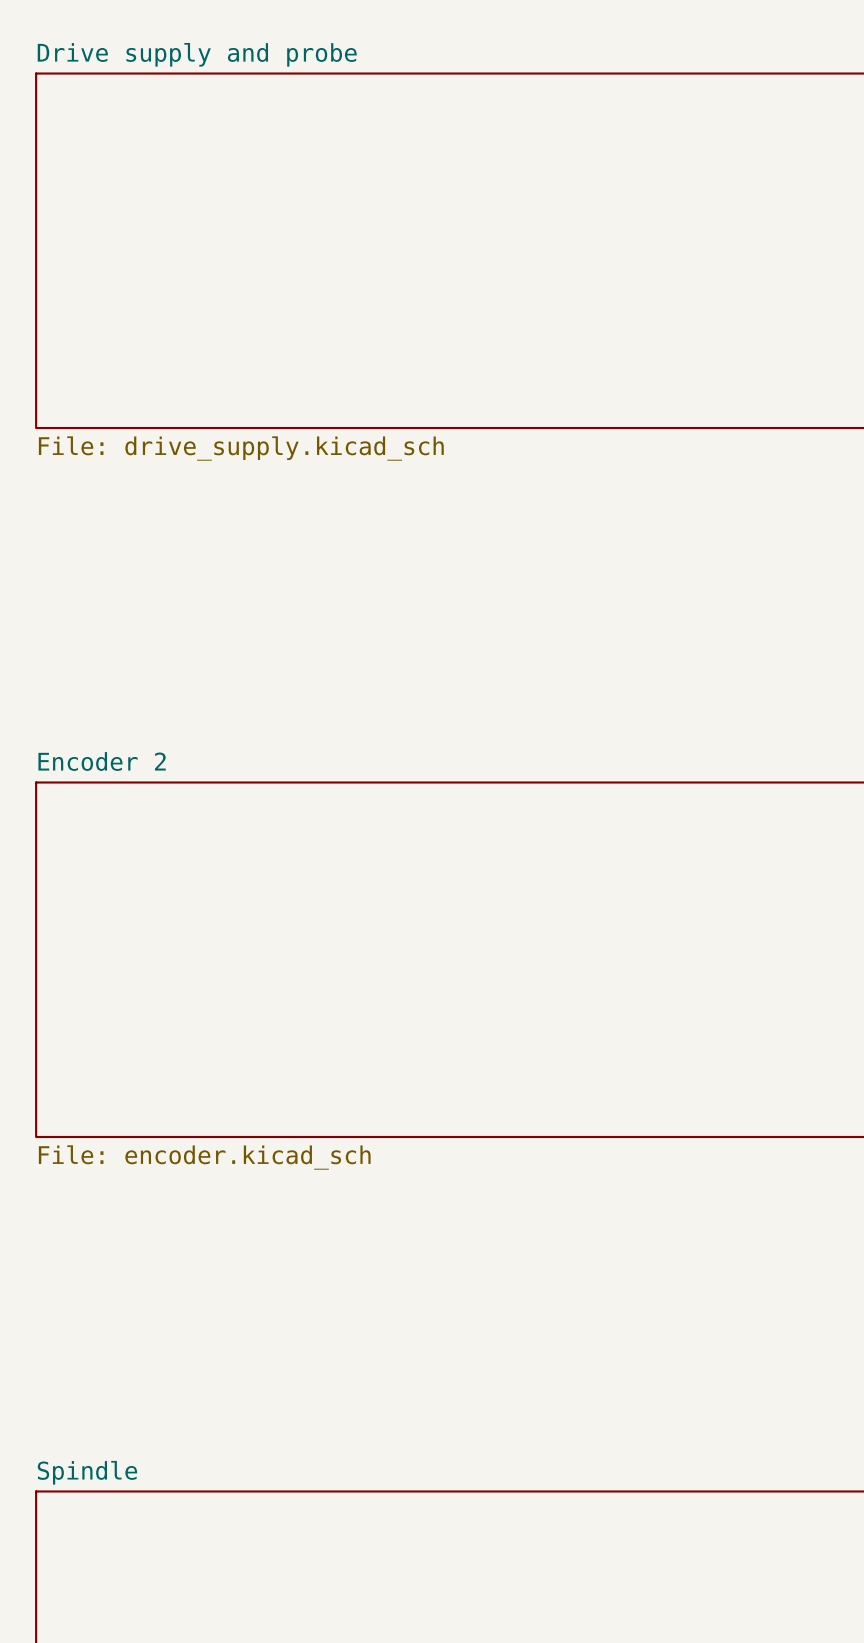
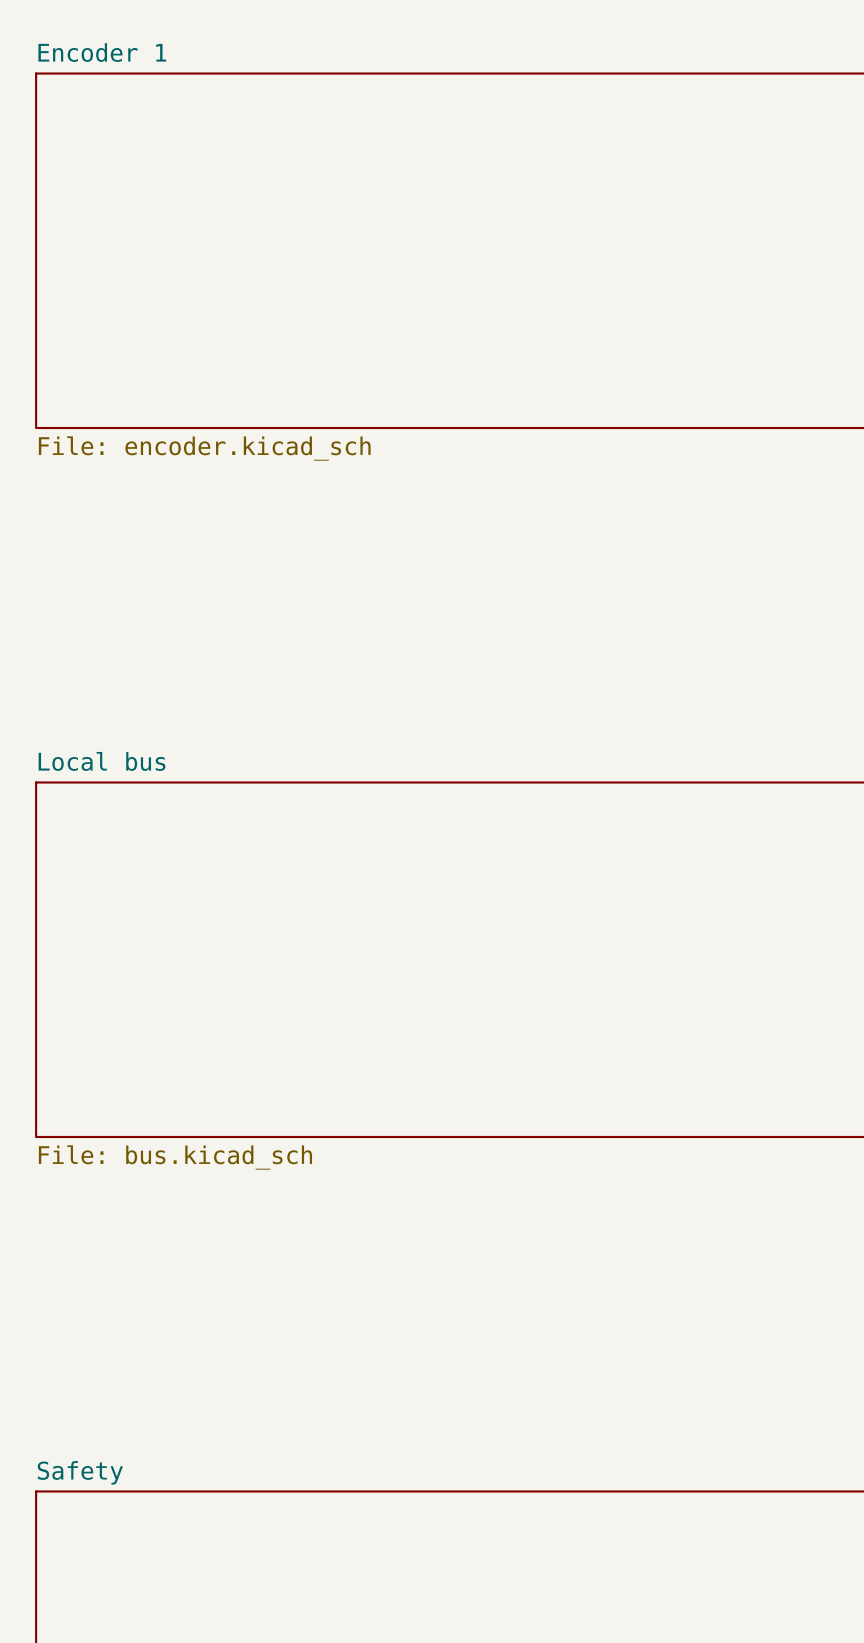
sheet Drive supply and probe name: Drive supply and probe (197, 54) -> Encoder 1 (102, 52)
sheet Drive supply and probe value: File: drive_supply.kicad_sch (241, 448) -> File: encoder.kicad_sch (204, 448)
sheet Encoder 2 name: Encoder 2 (102, 761) -> Local bus (102, 761)
sheet Encoder 2 value: File: encoder.kicad_sch (204, 1157) -> File: bus.kicad_sch (175, 1157)
sheet Spindle name: Spindle (87, 1472) -> Safety (80, 1472)

